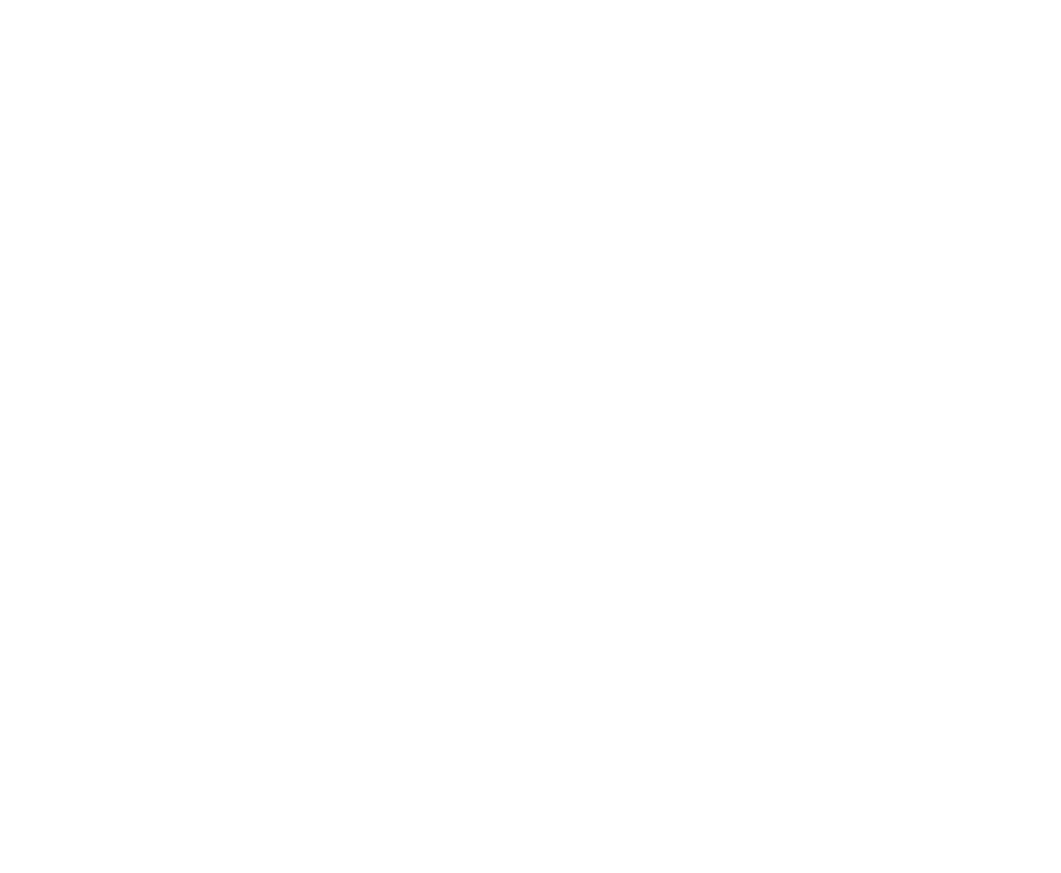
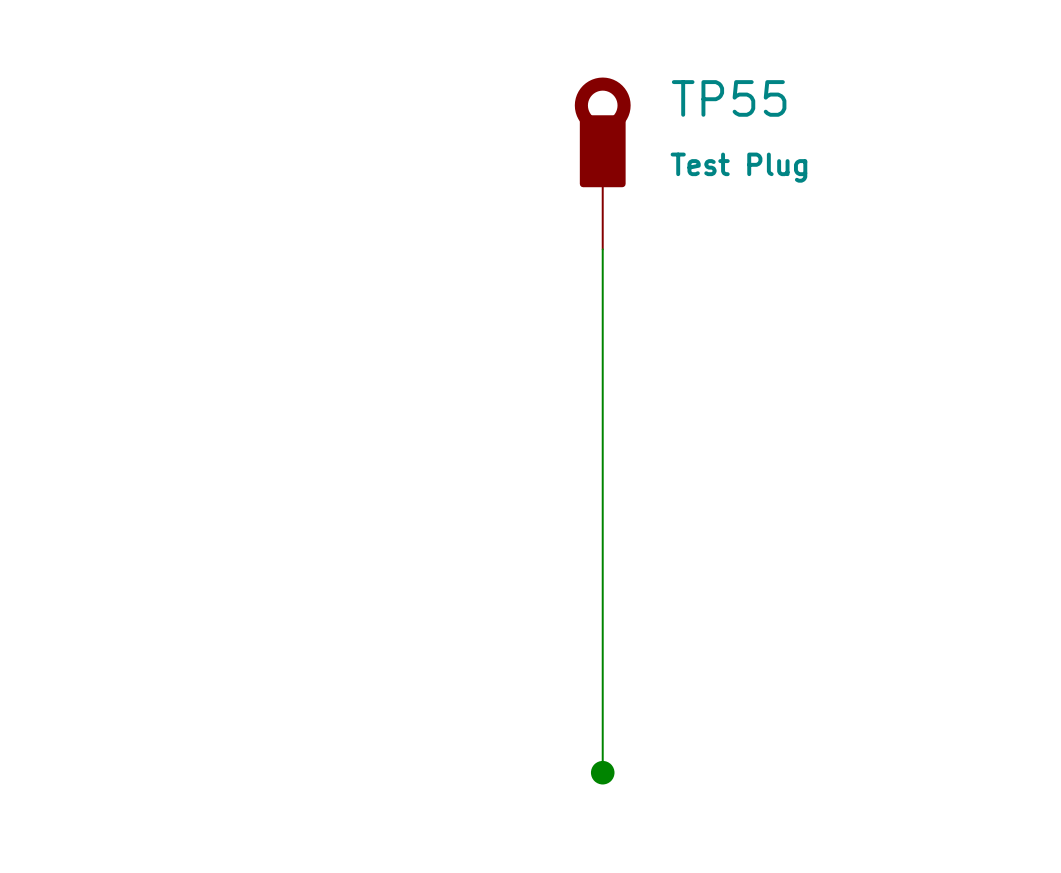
TP55: none -> (602, 163)
wire: none -> (602, 249) (602, 772)
junction: none -> (602, 772)

